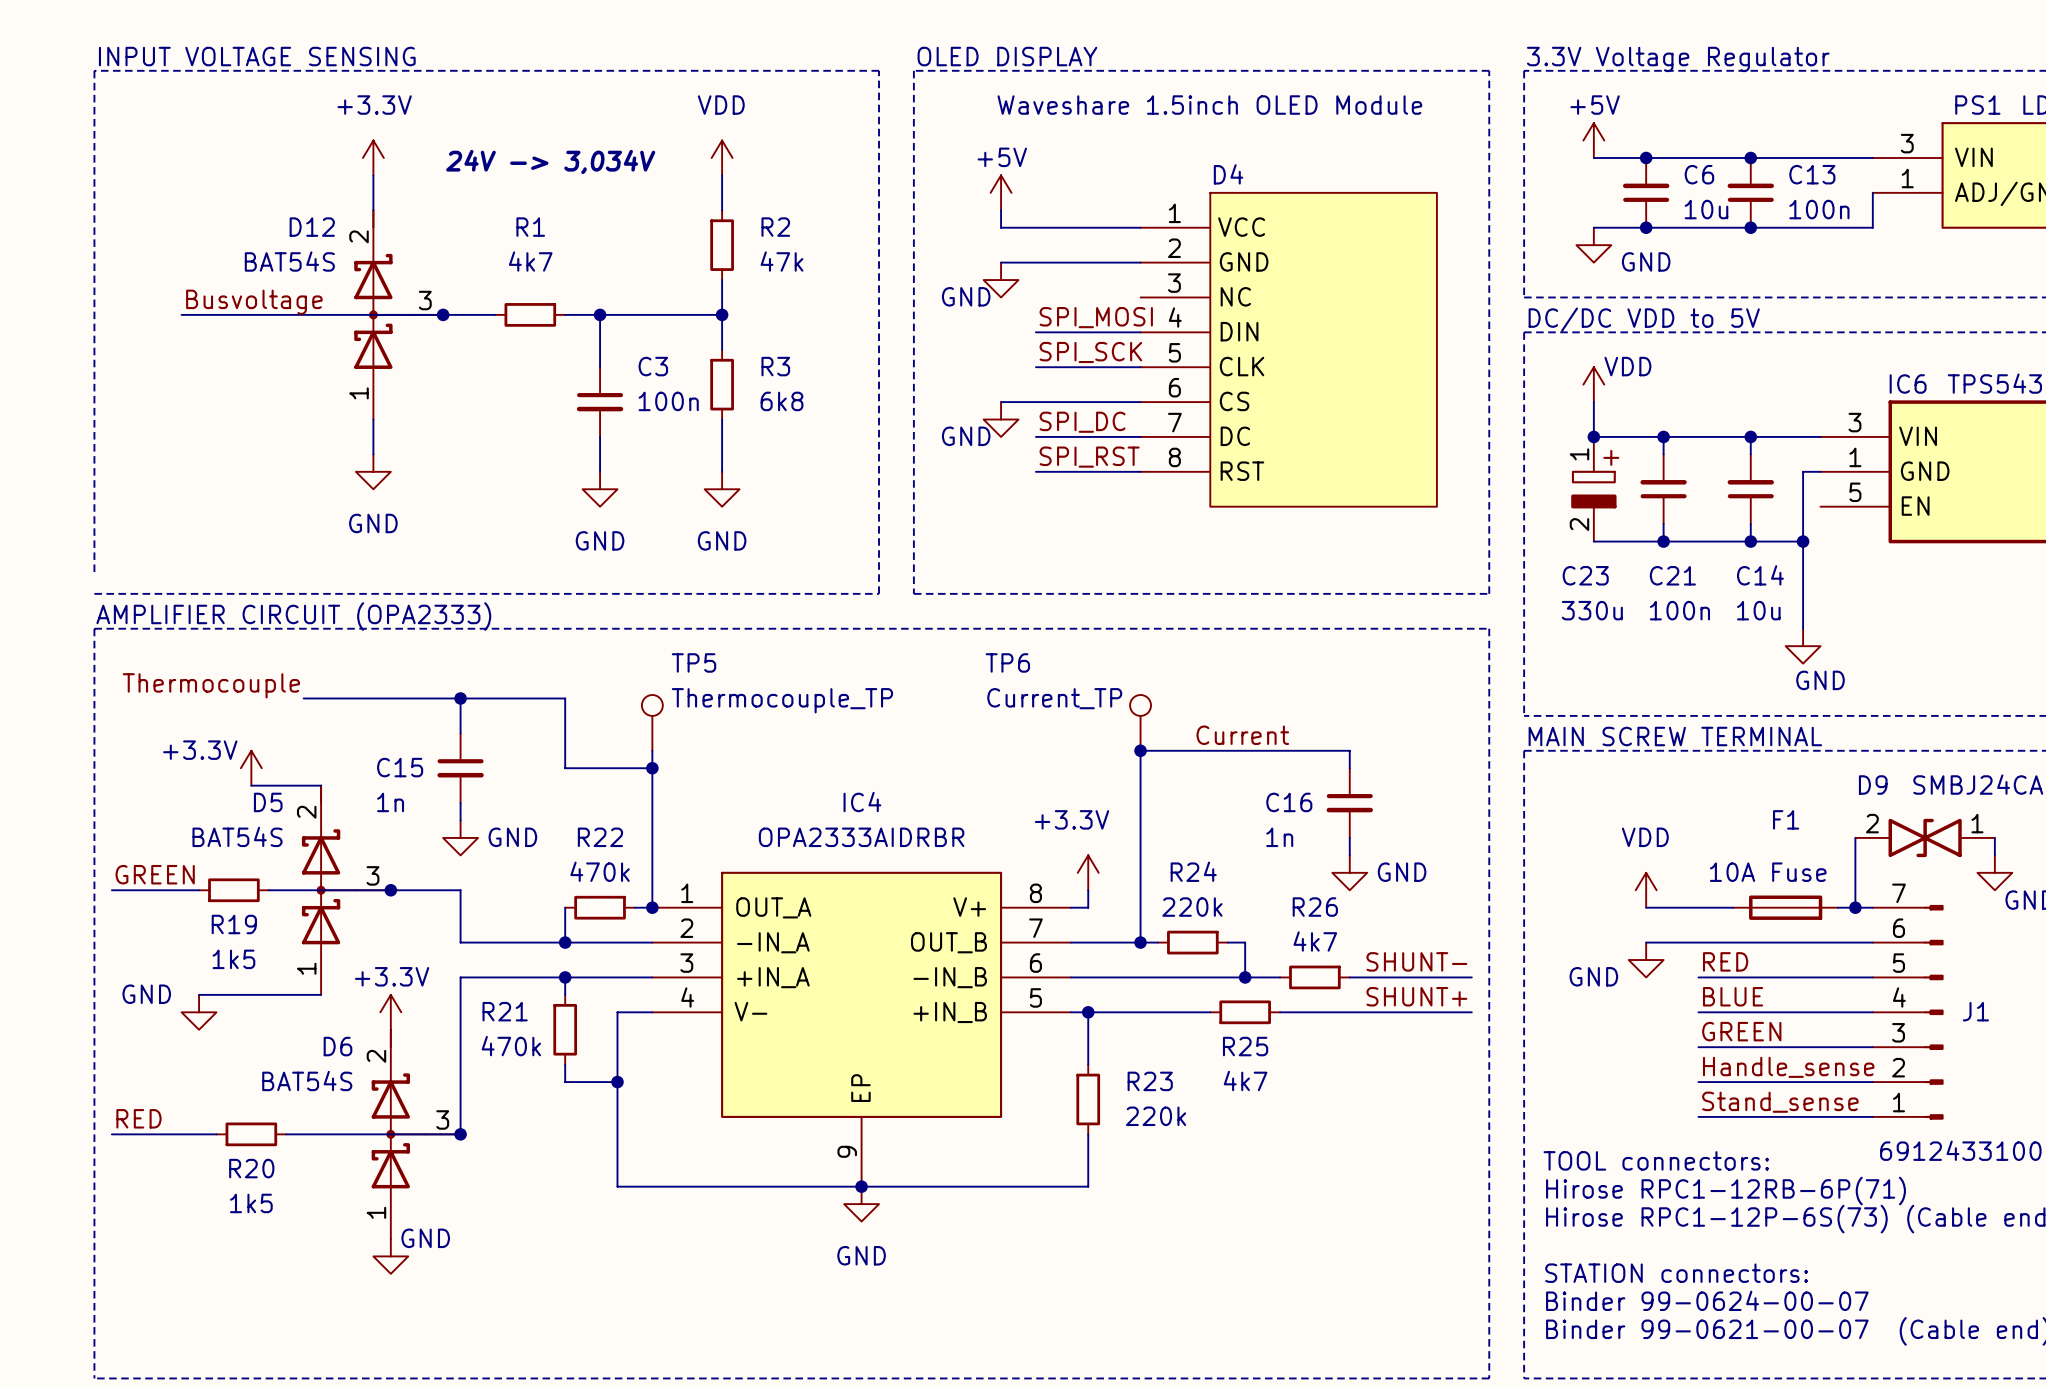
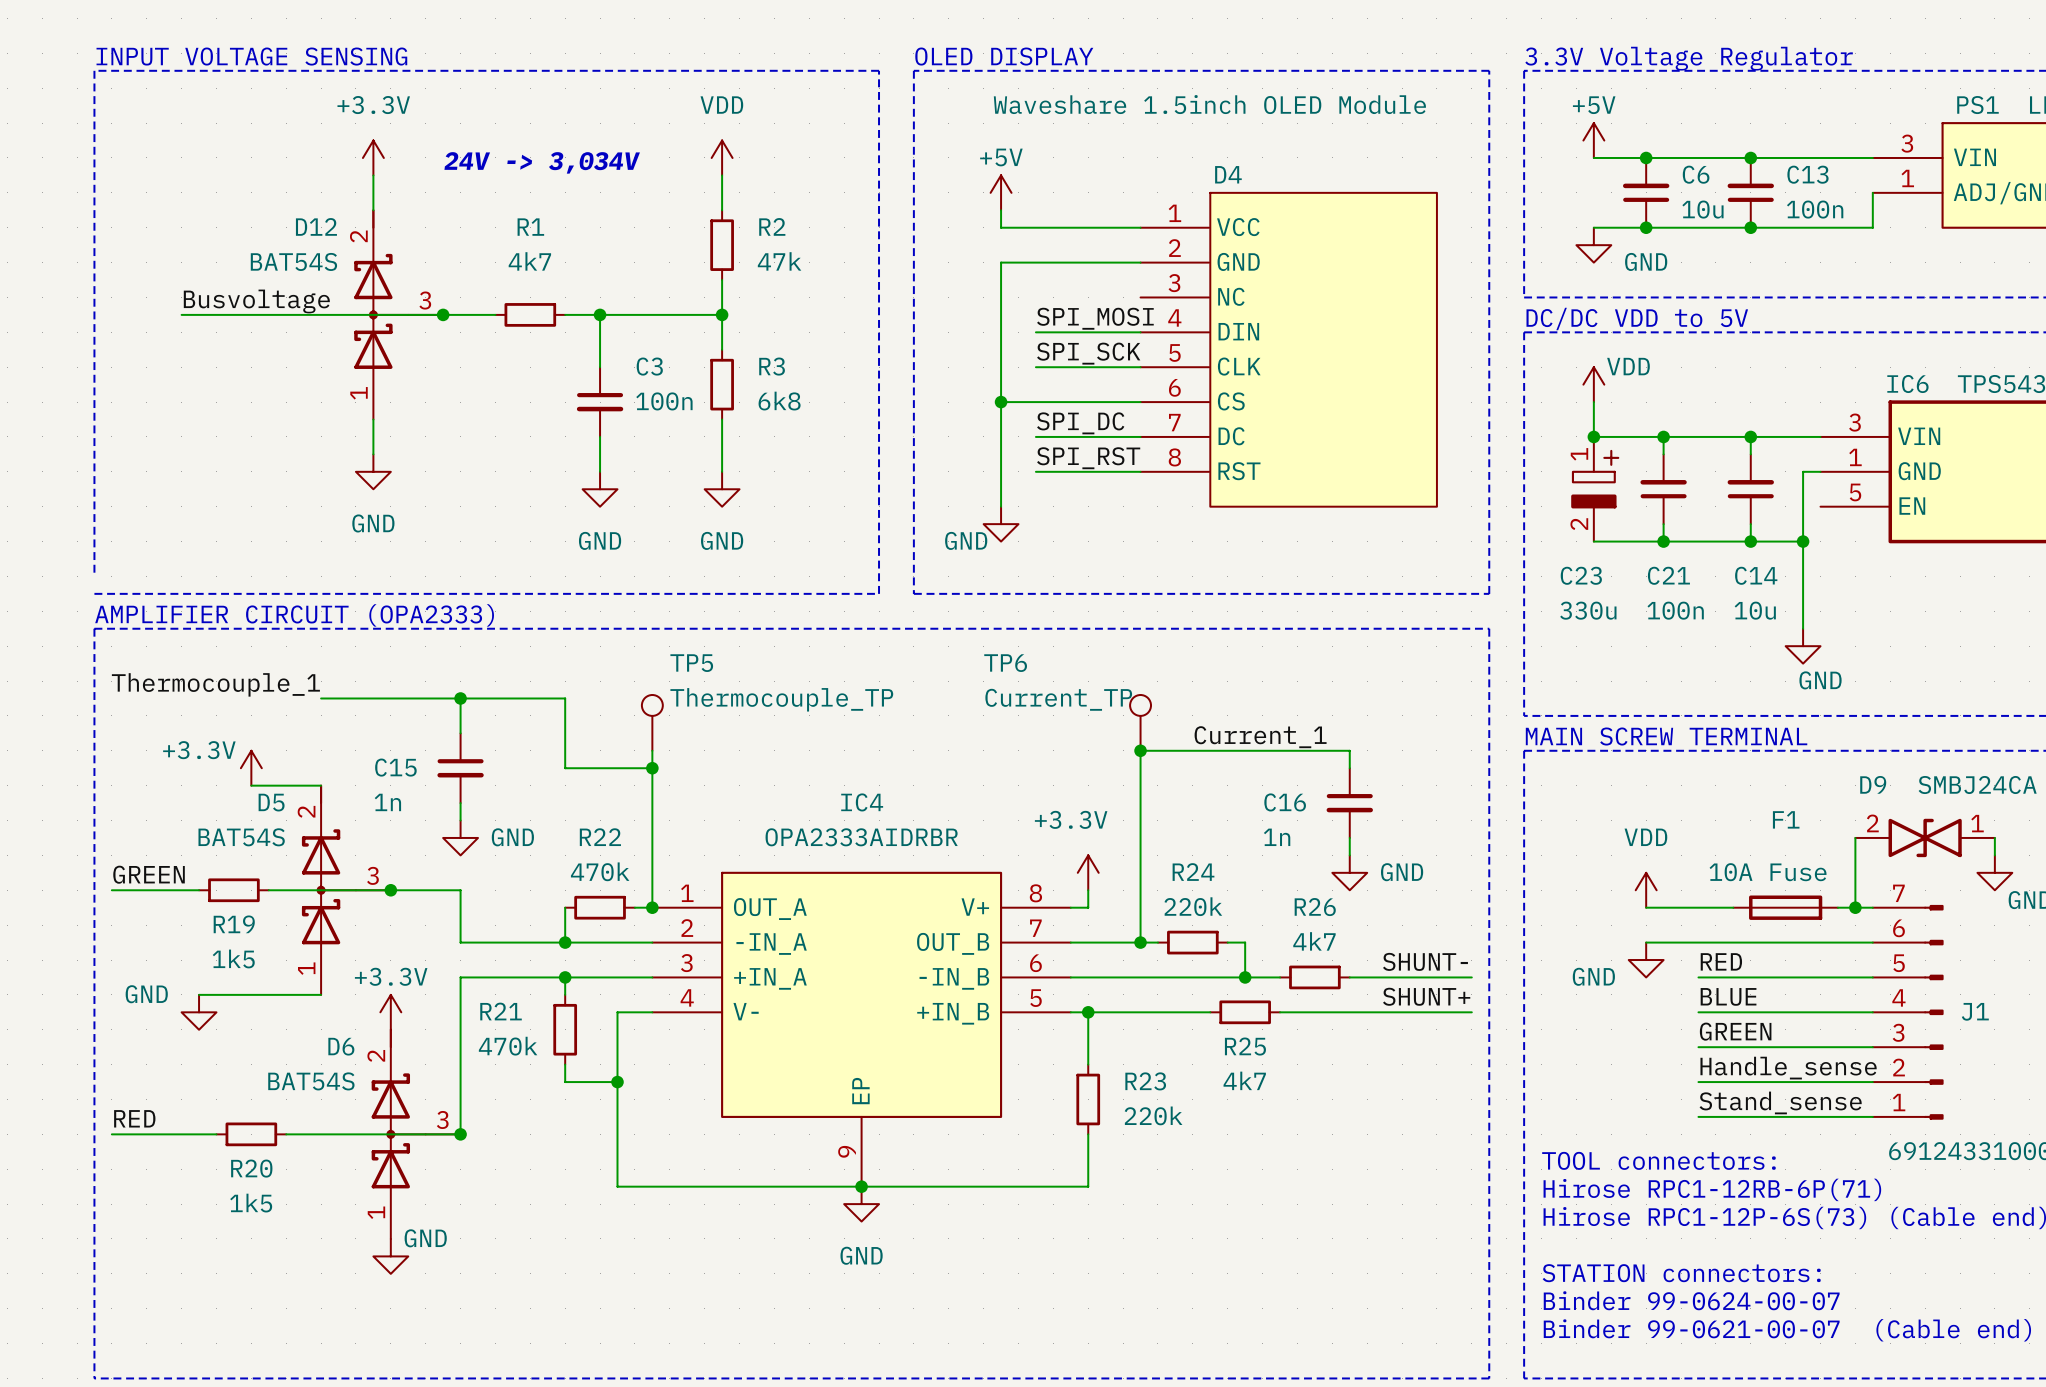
wire: none -> (1001, 262) (1001, 506)
power symbol: GND (1001, 280) -> none
junction: none -> (1001, 402)
power symbol position: GND (1001, 419) -> GND (1001, 524)
label: Thermocouple (211, 685) -> Thermocouple_1 (215, 684)
wire: (303, 698) (321, 698) -> none
label: Current (1242, 735) -> Current_1 (1260, 737)

